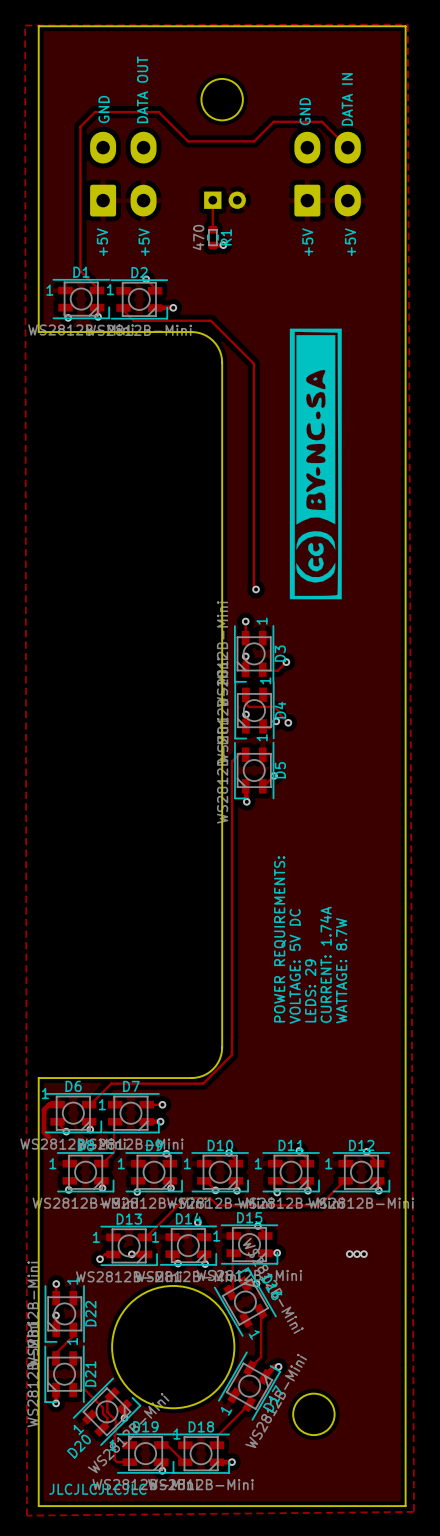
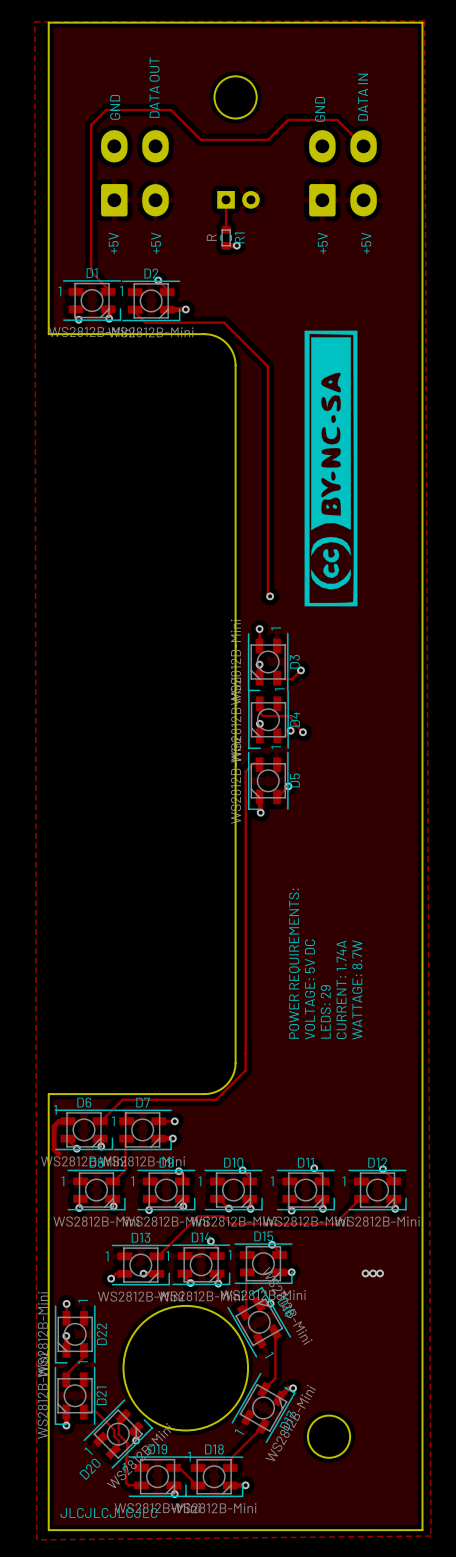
R1 value: 470 (198, 237) -> R (211, 237)

